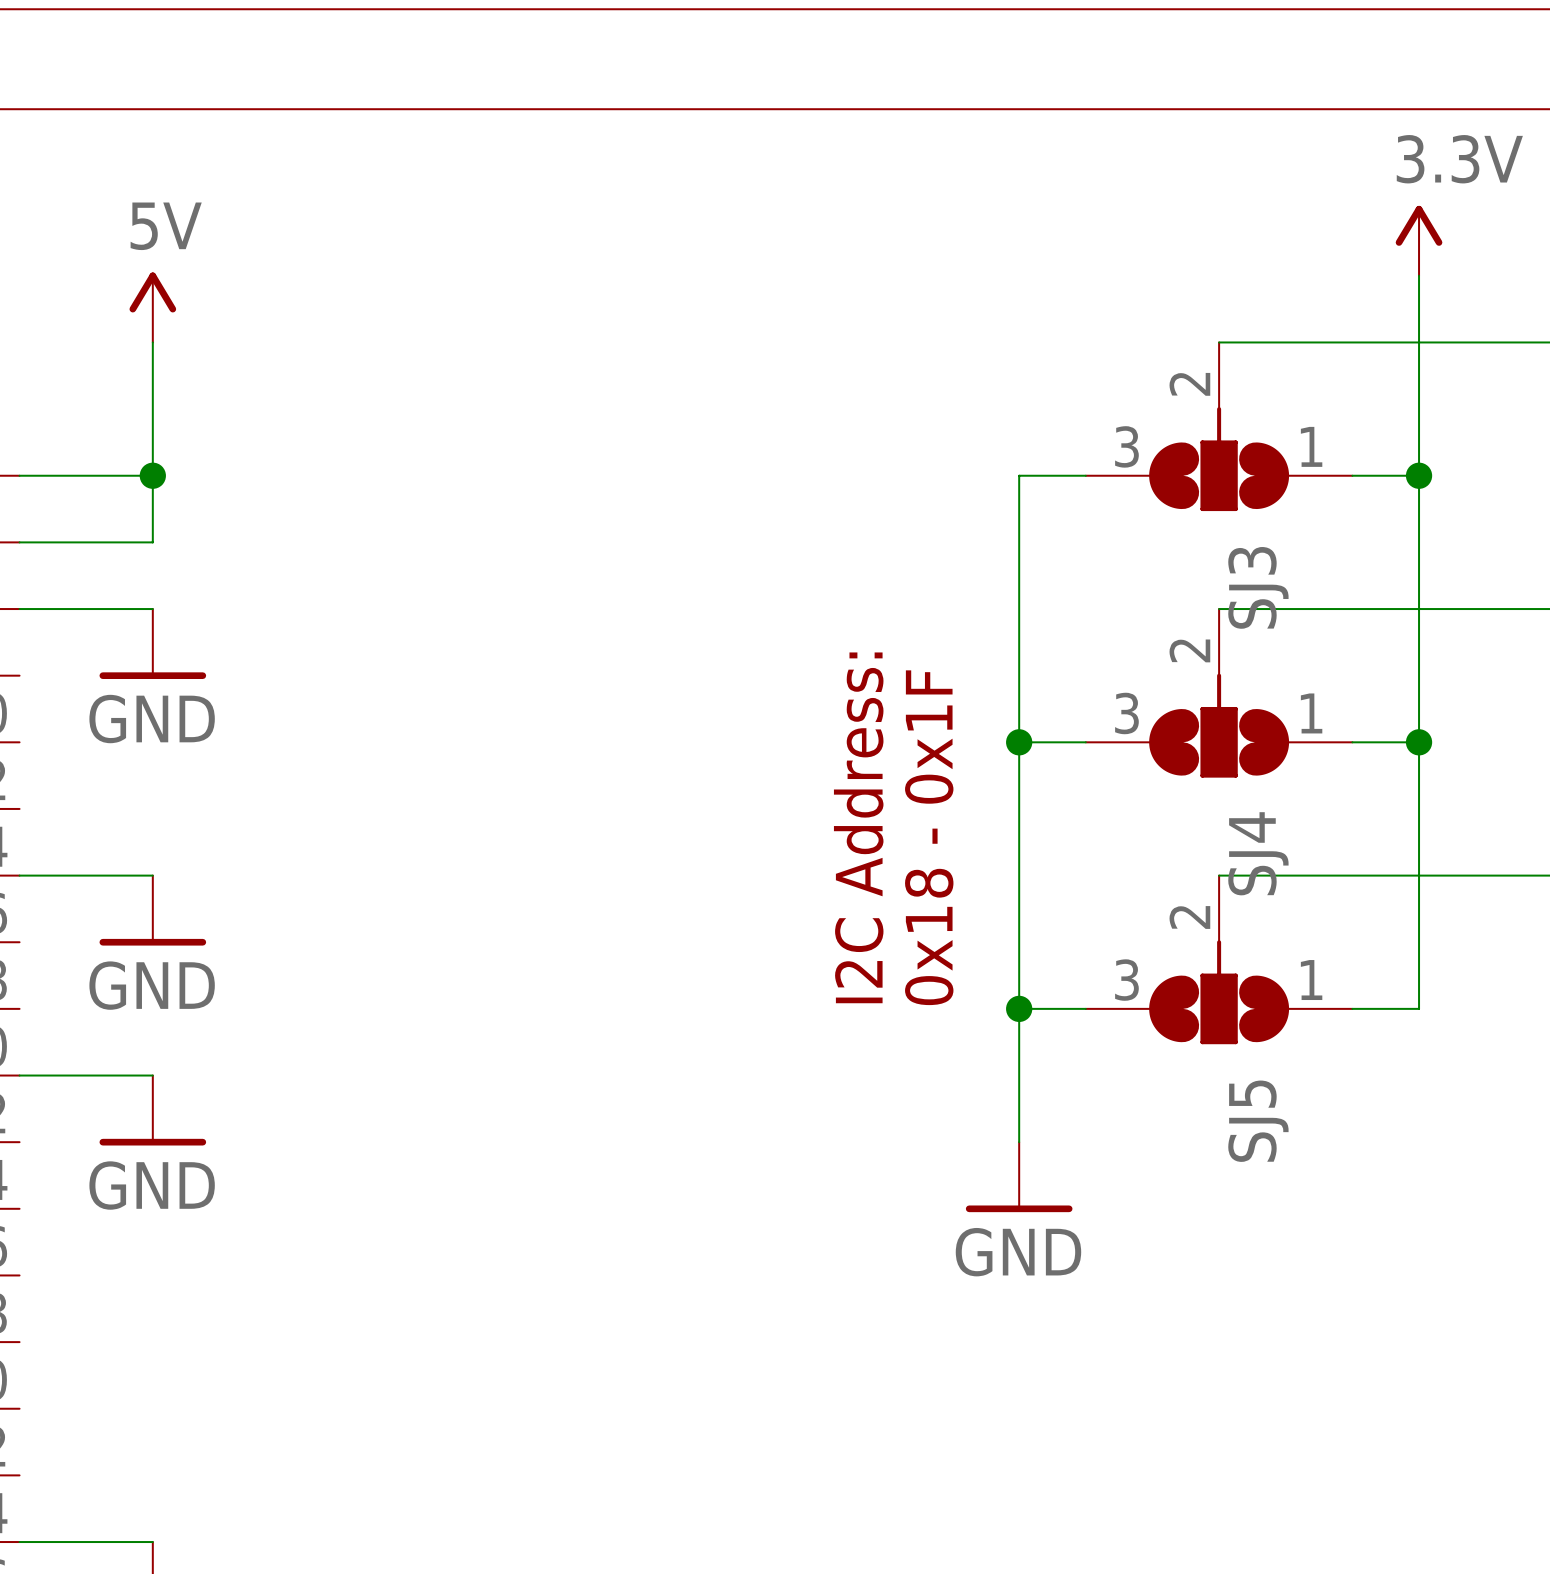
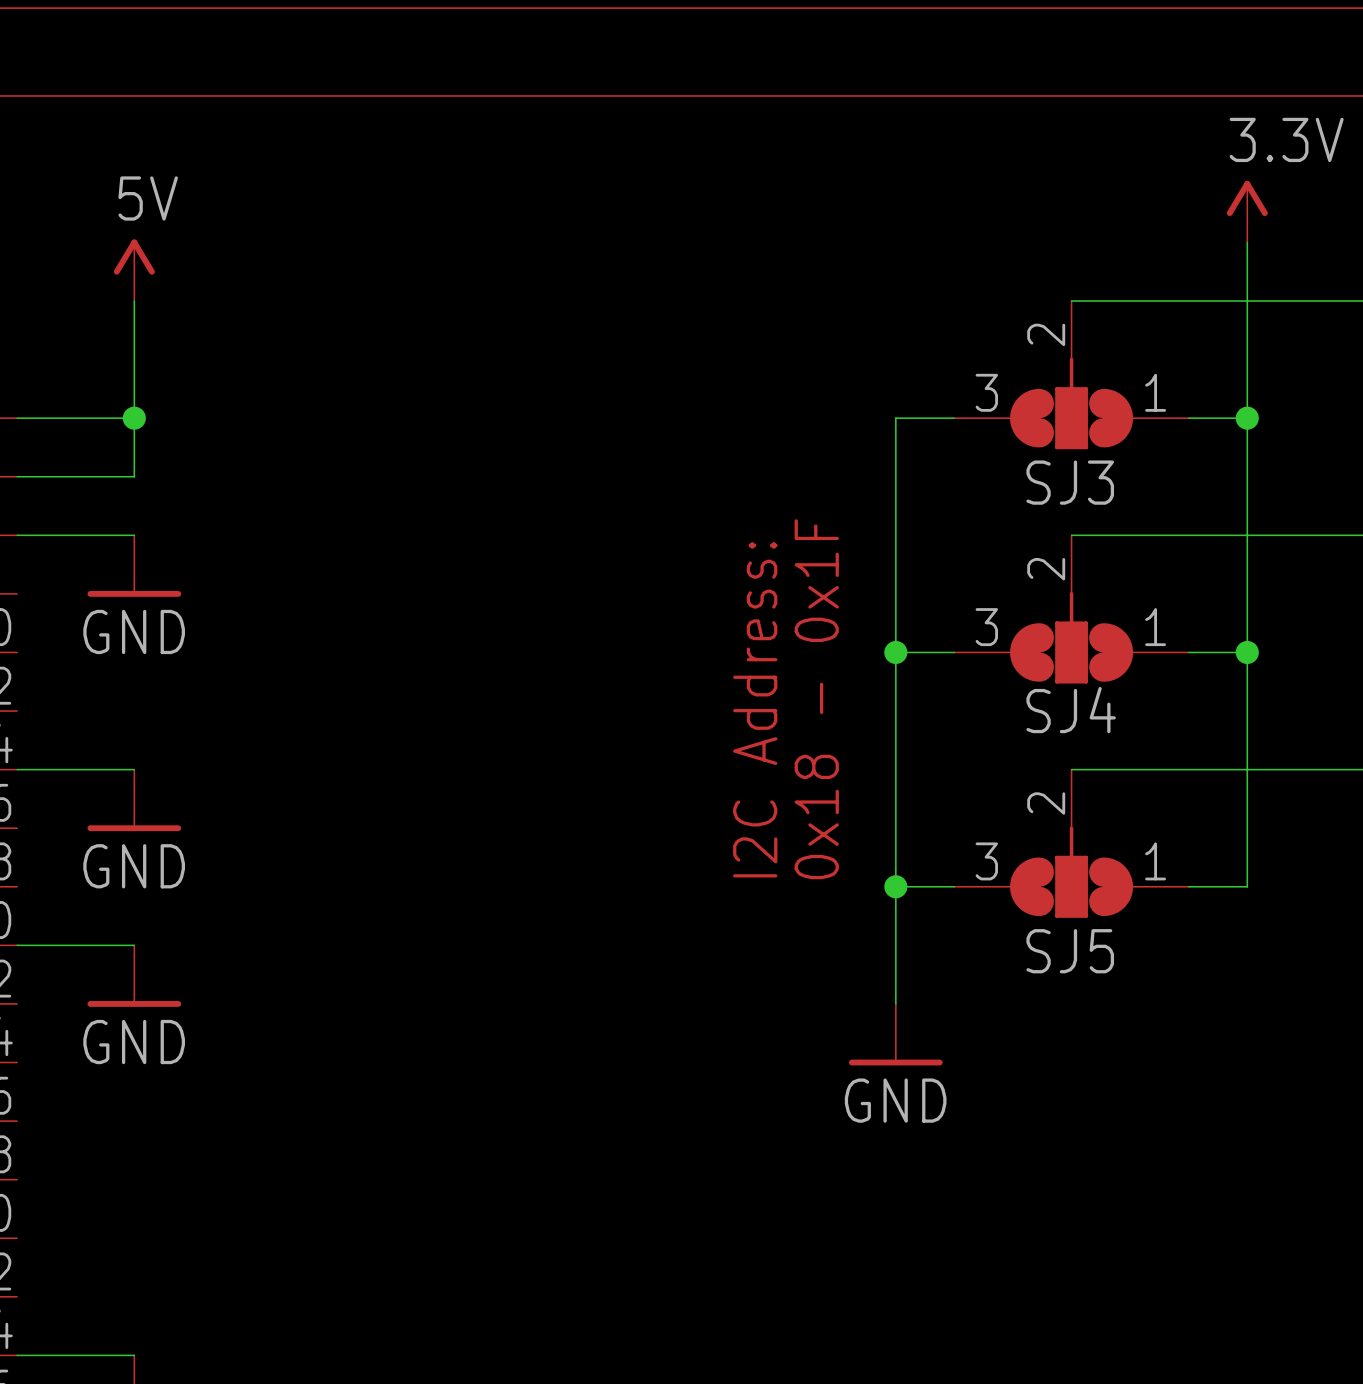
SJ3 name rotation: 0° (1258, 587) -> 90° clockwise (1070, 482)
SJ4 name rotation: 0° (1258, 853) -> 90° clockwise (1071, 710)
SJ5 name rotation: 0° (1258, 1121) -> 90° clockwise (1070, 951)

